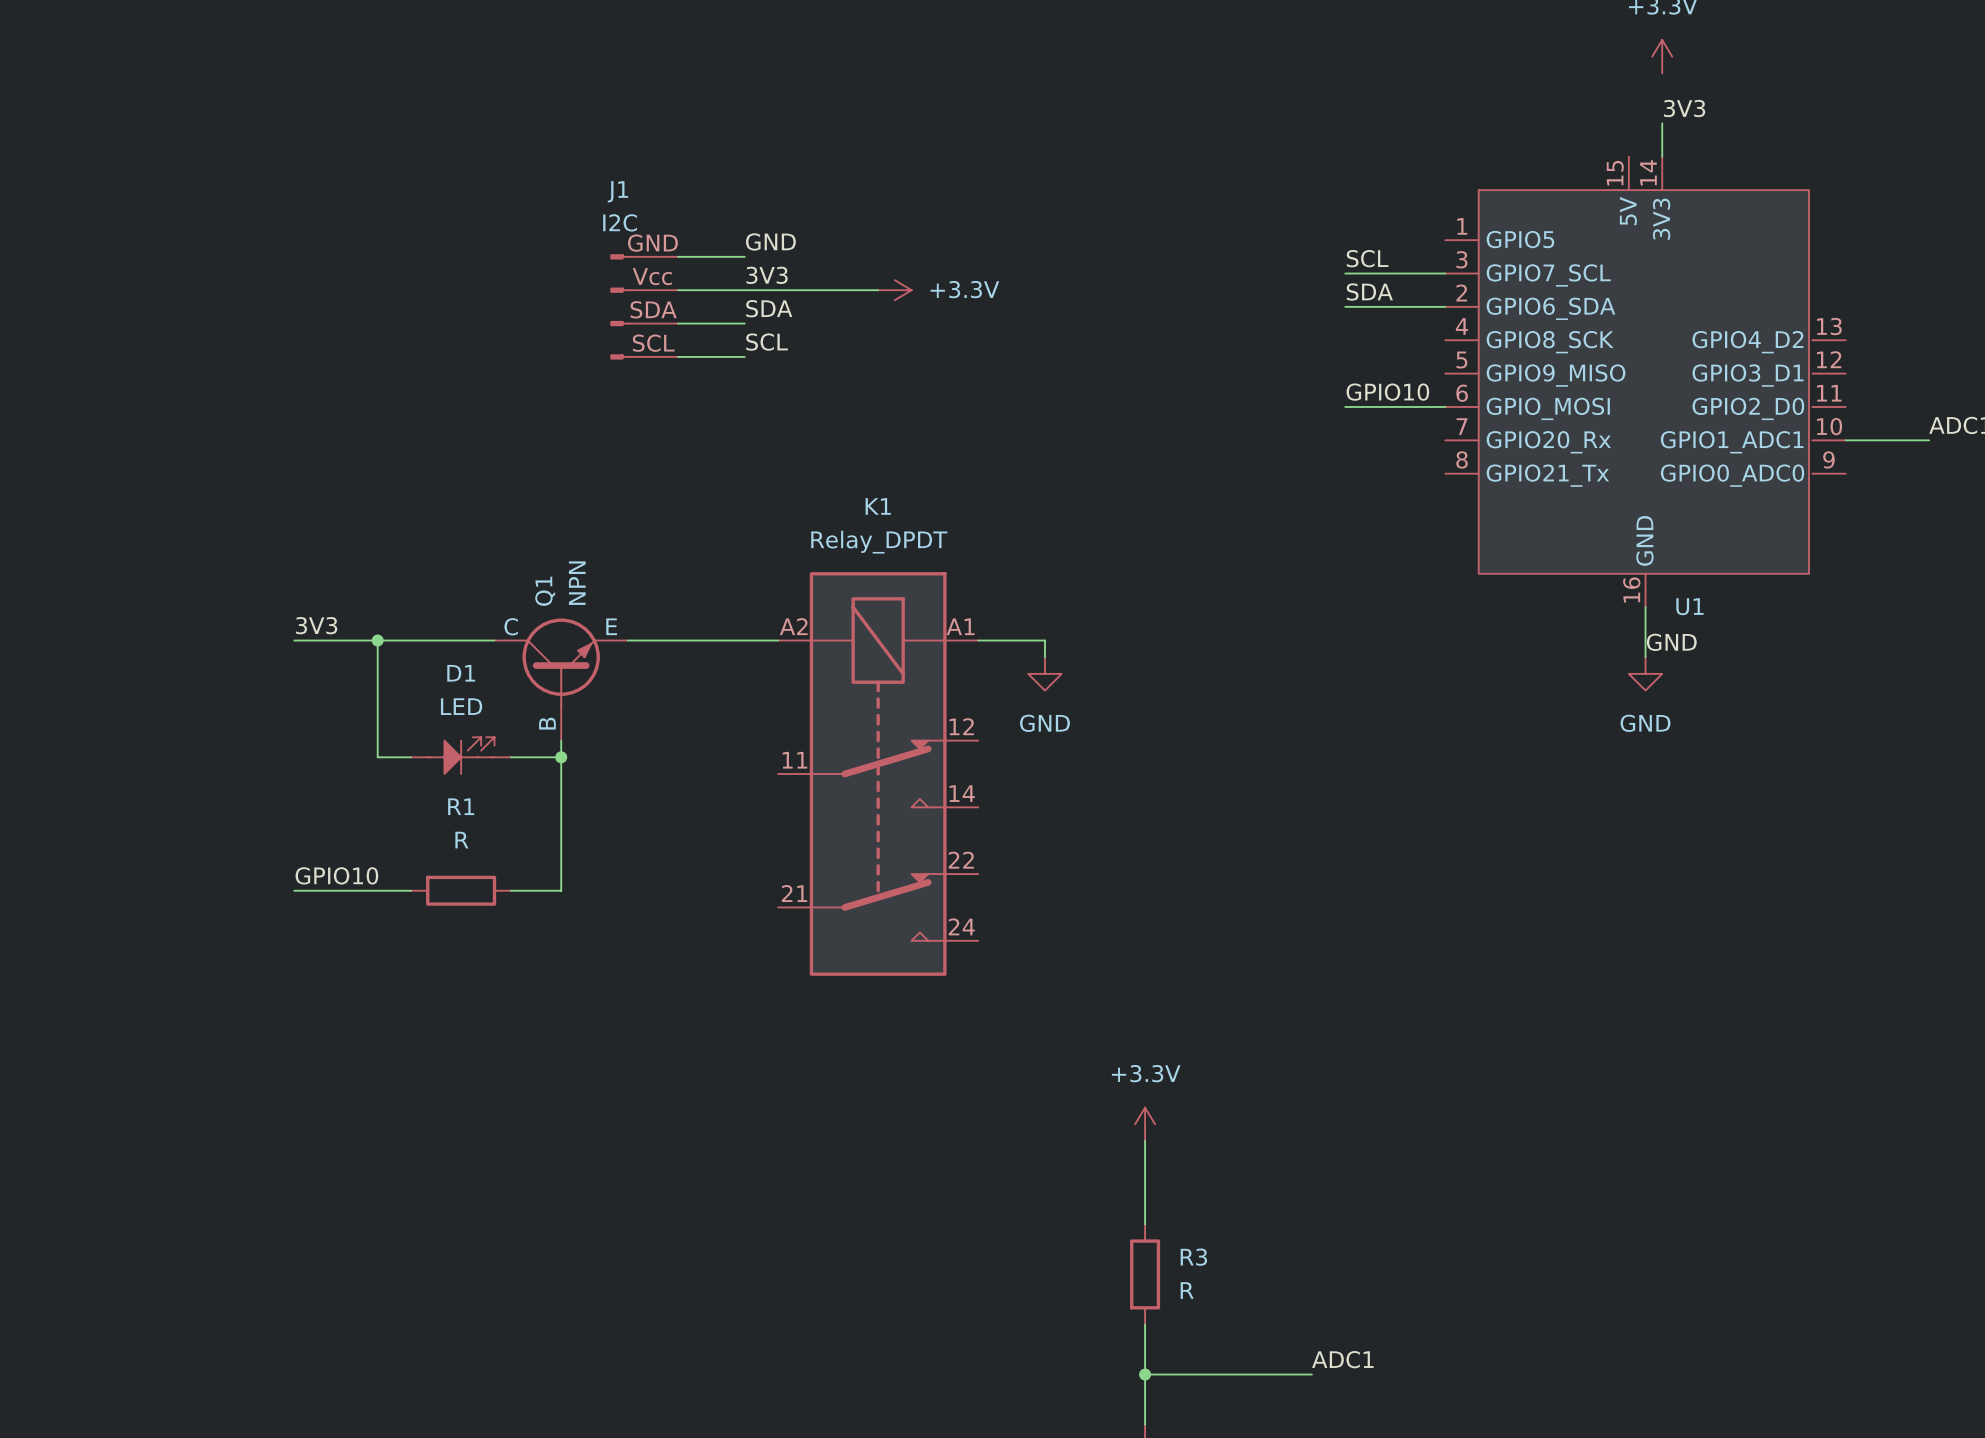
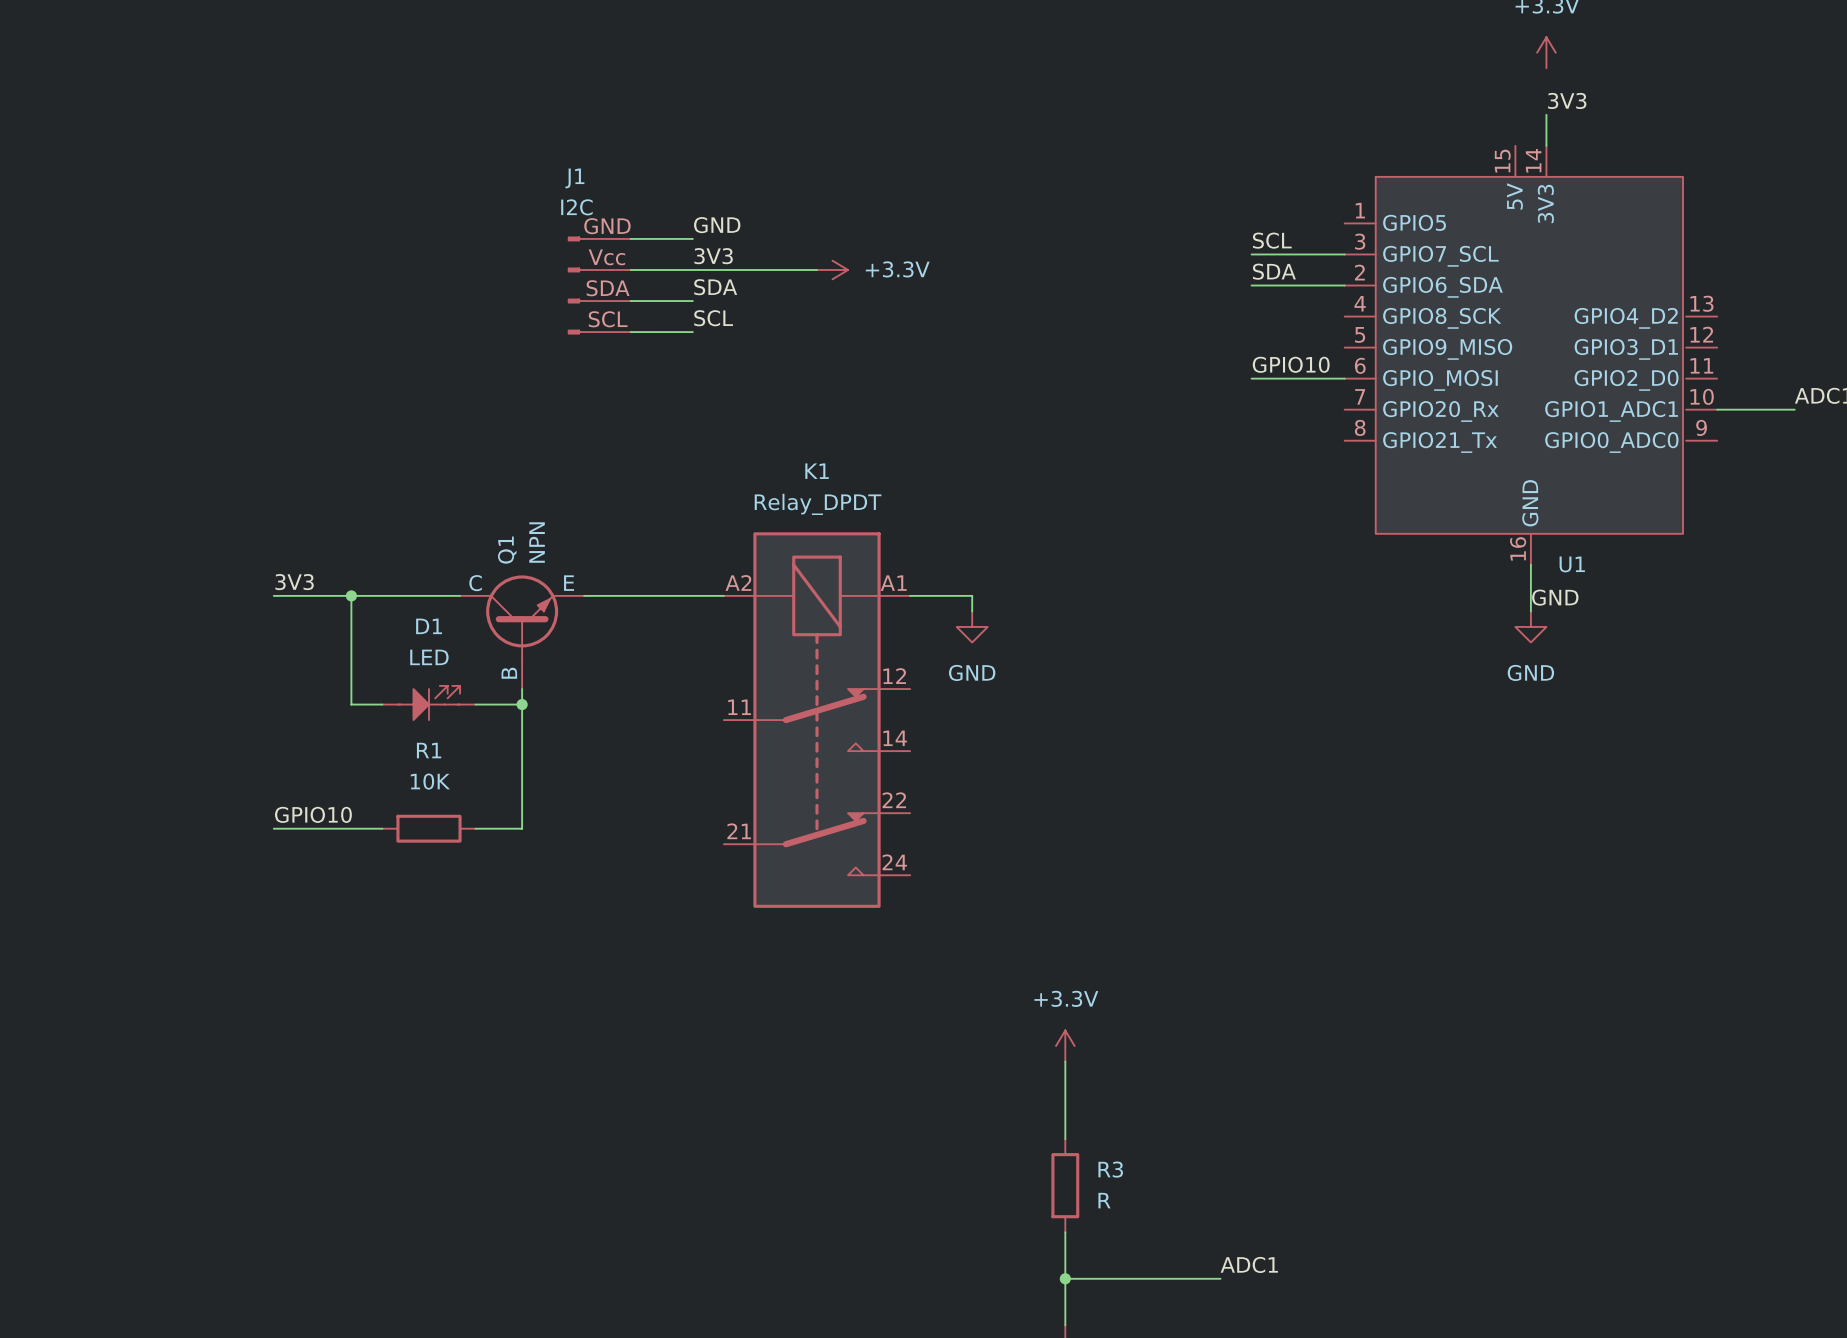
R1 value: R (461, 840) -> 10K (430, 781)

